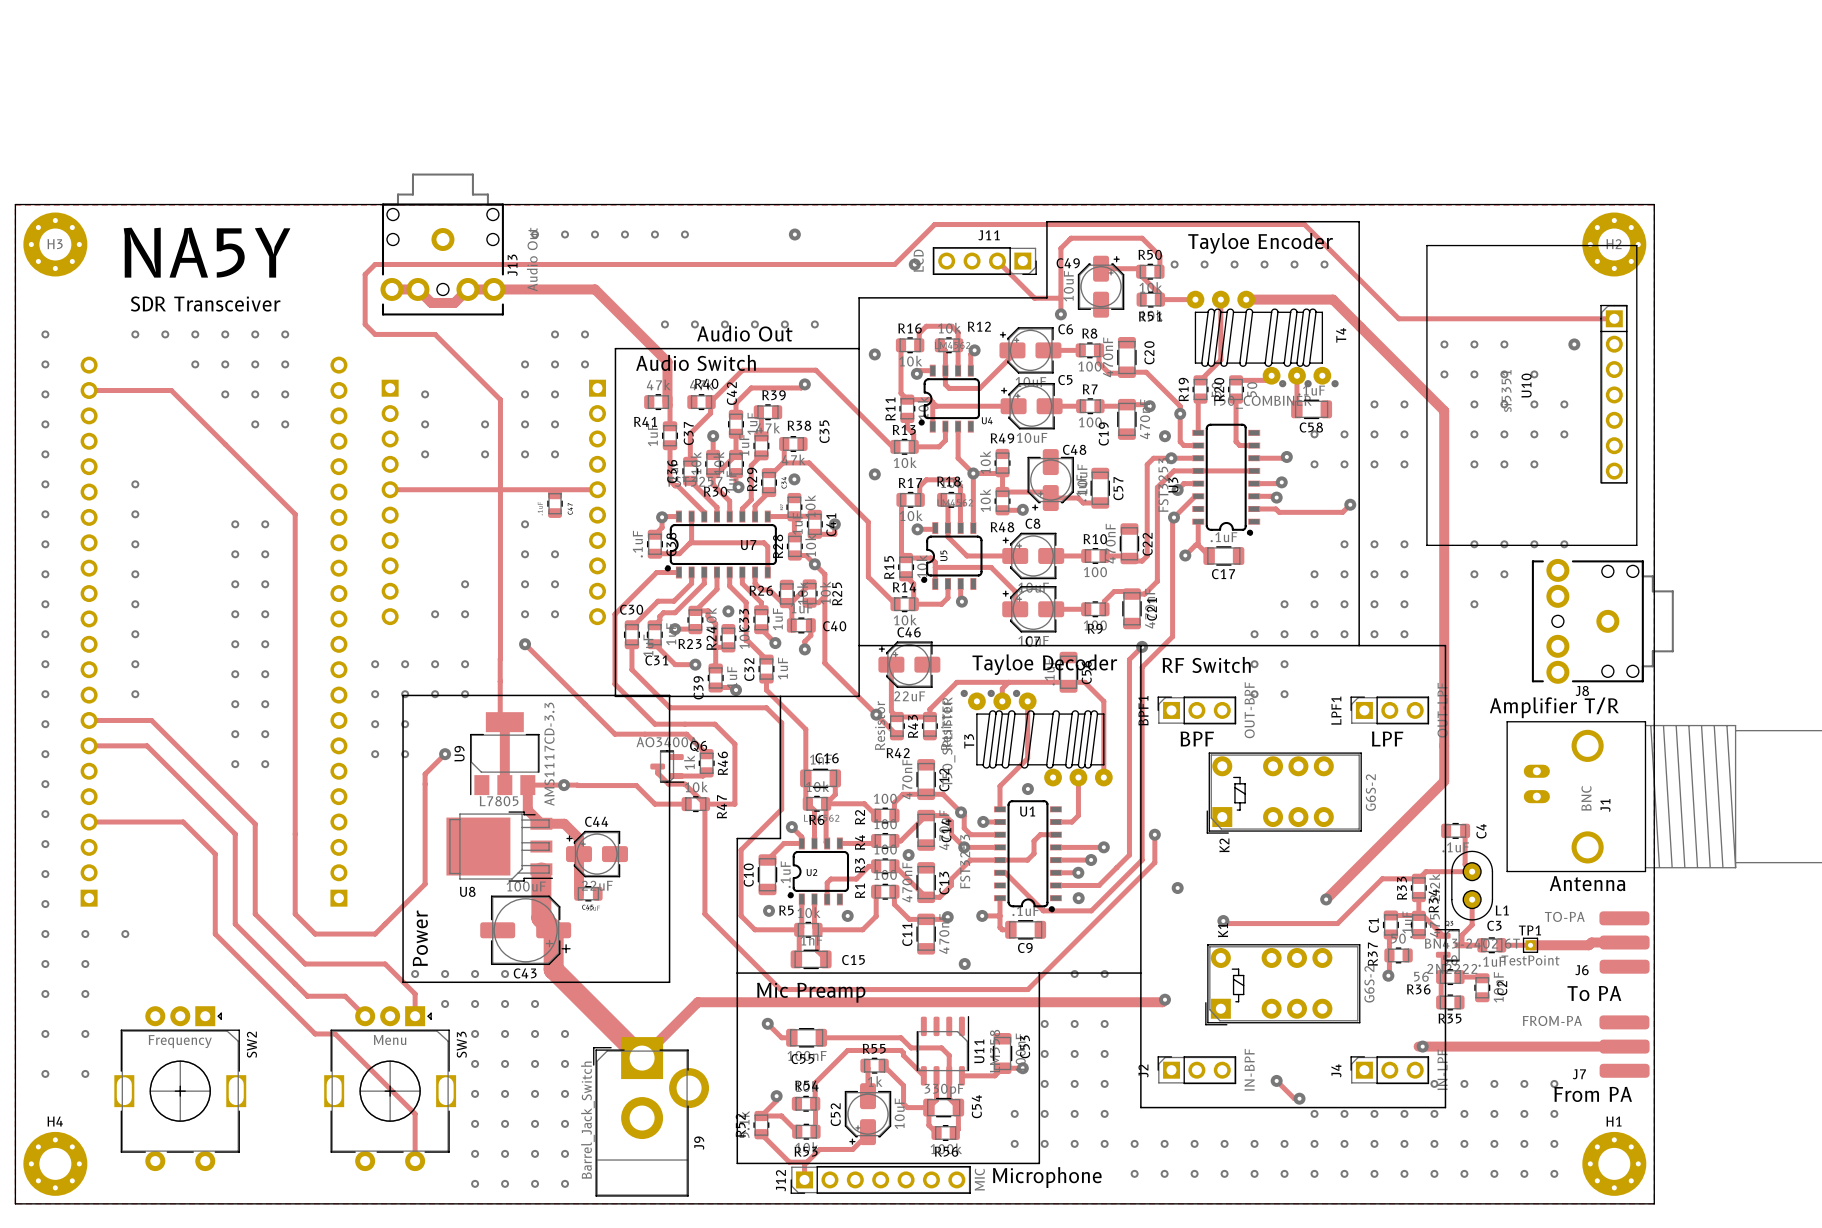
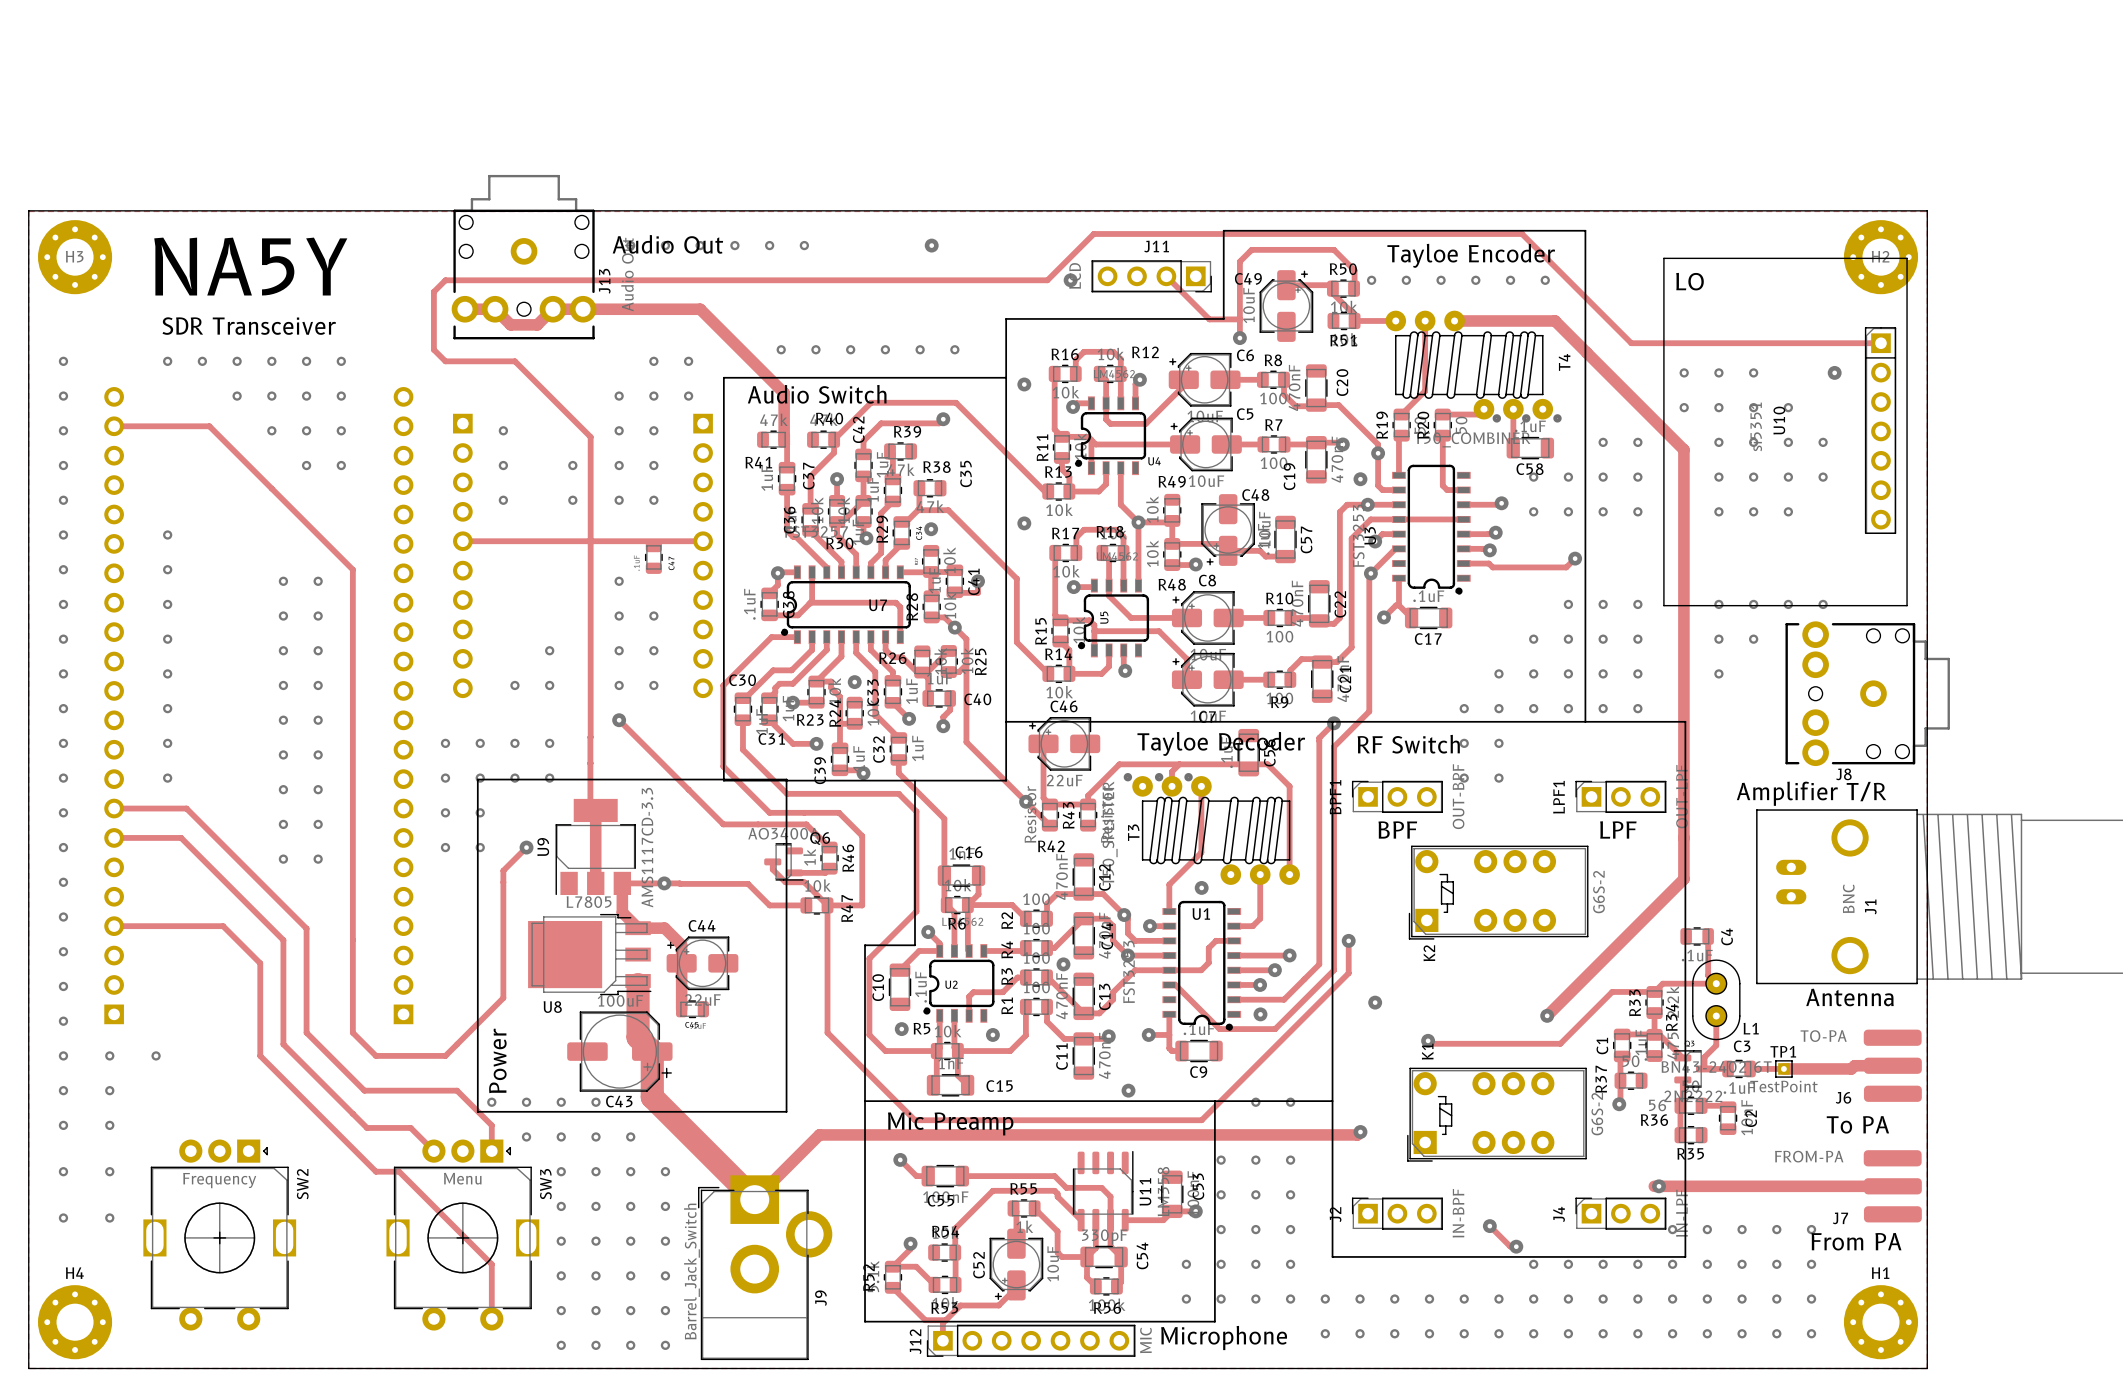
text: none -> LO (1690, 281)
text position: Audio Out (744, 333) -> Audio Out (667, 244)

